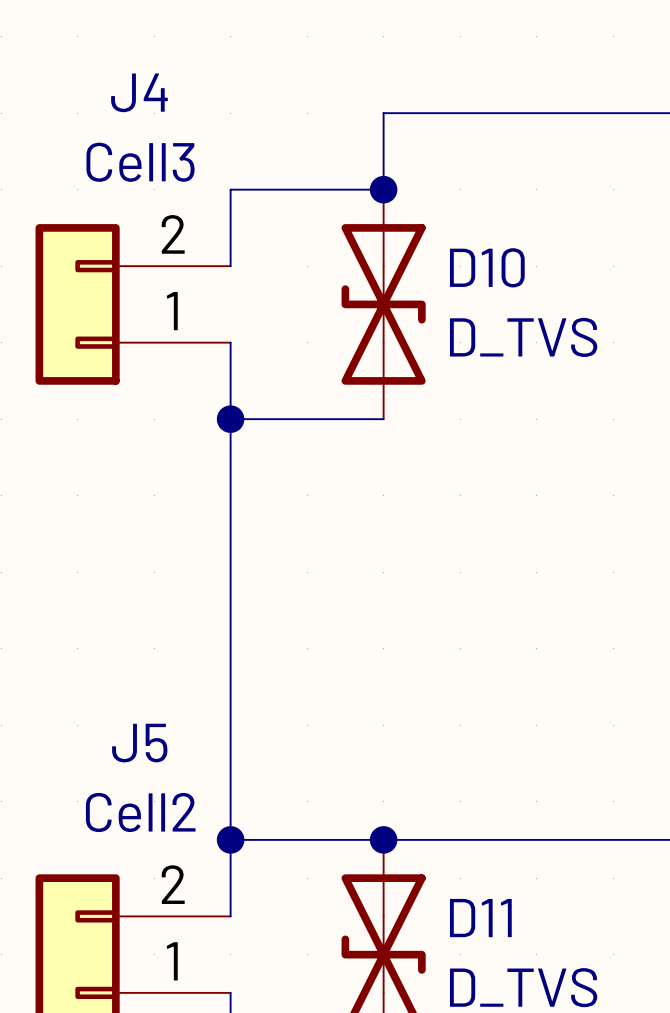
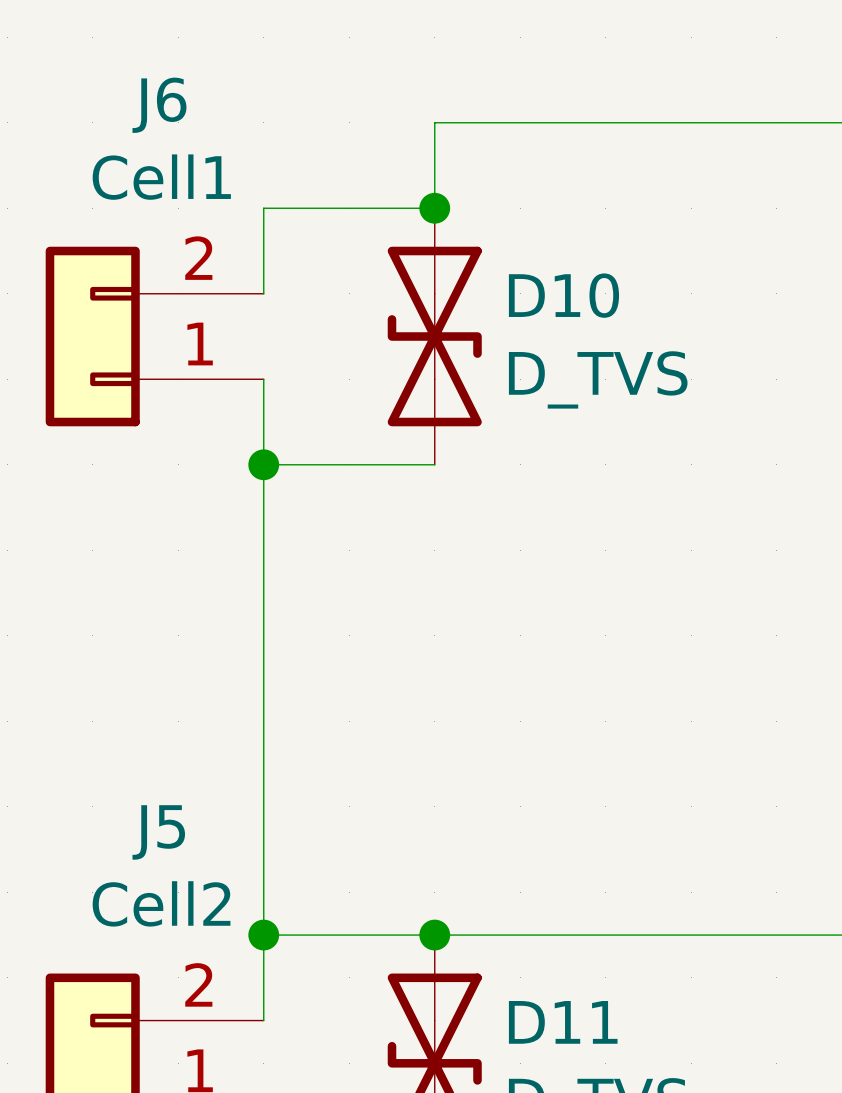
J4 name: J4 (139, 92) -> J6 (159, 105)
J4 value: Cell3 (140, 162) -> Cell1 (161, 177)

